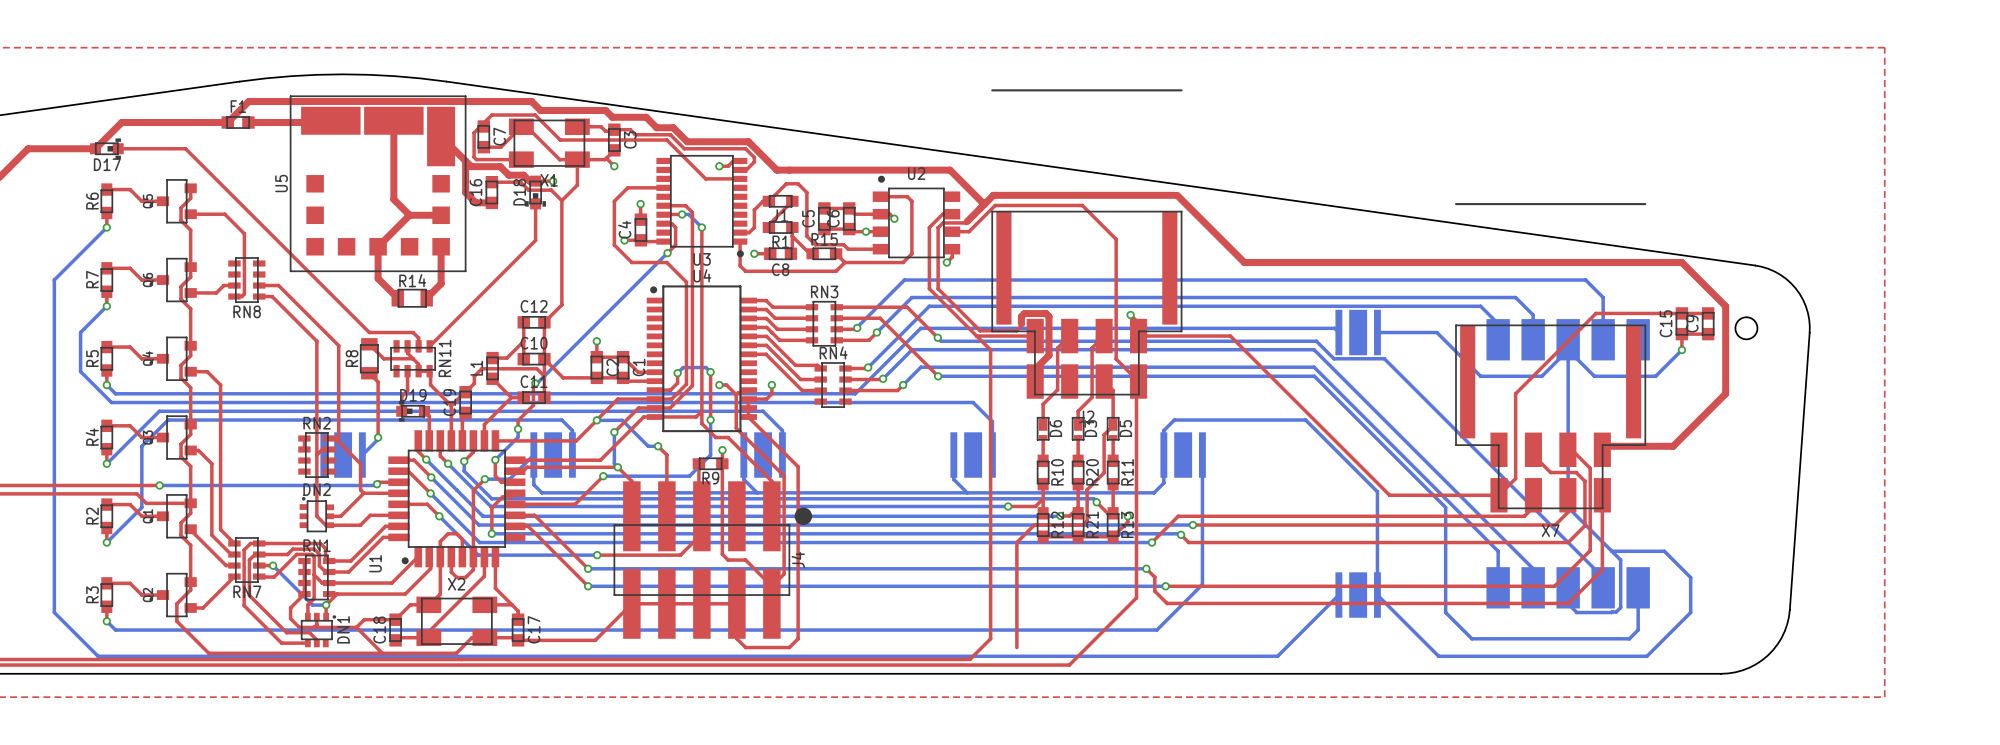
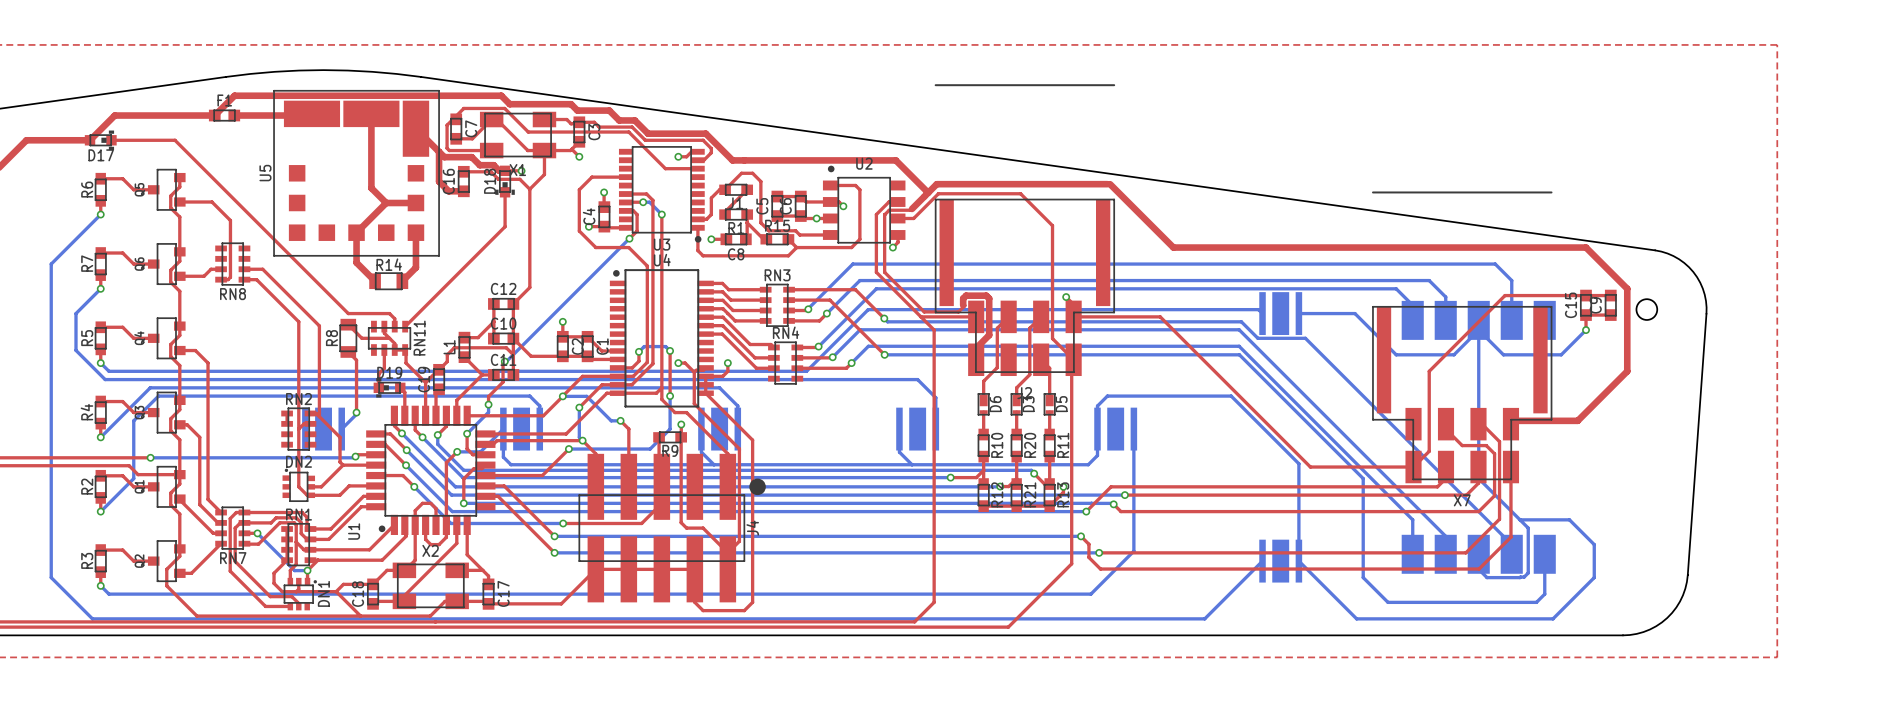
top track: (1113, 424) (1104, 434) (1104, 472) (1087, 489) (1087, 520) (1083, 525) (1034, 525) (1016, 542) (1016, 647) -> none

